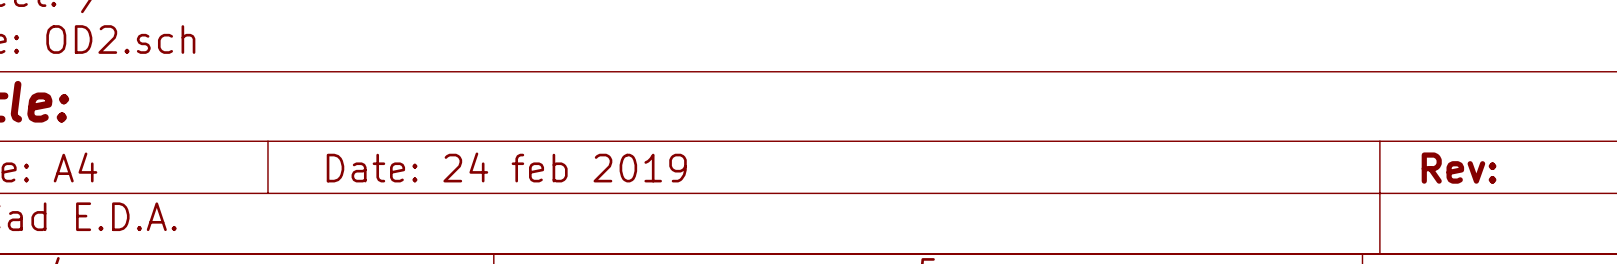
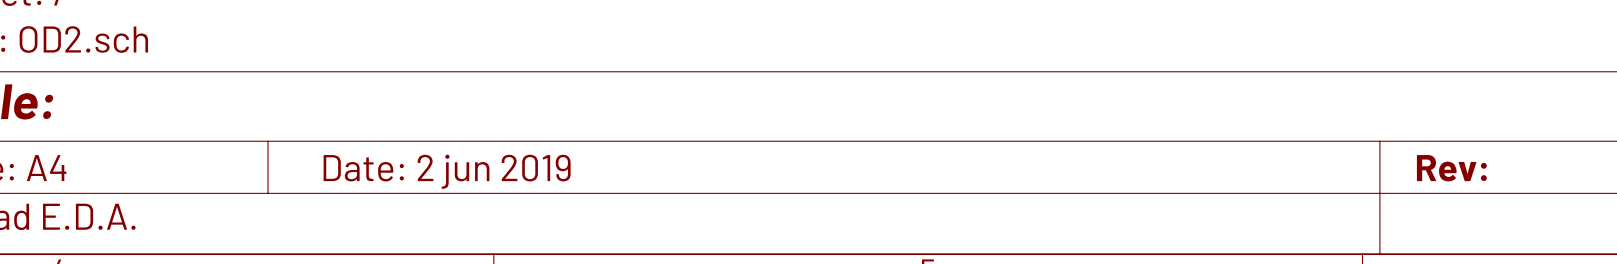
title block: Date: 24 feb 2019 (506, 167) -> Date: 2 jun 2019 (447, 171)

